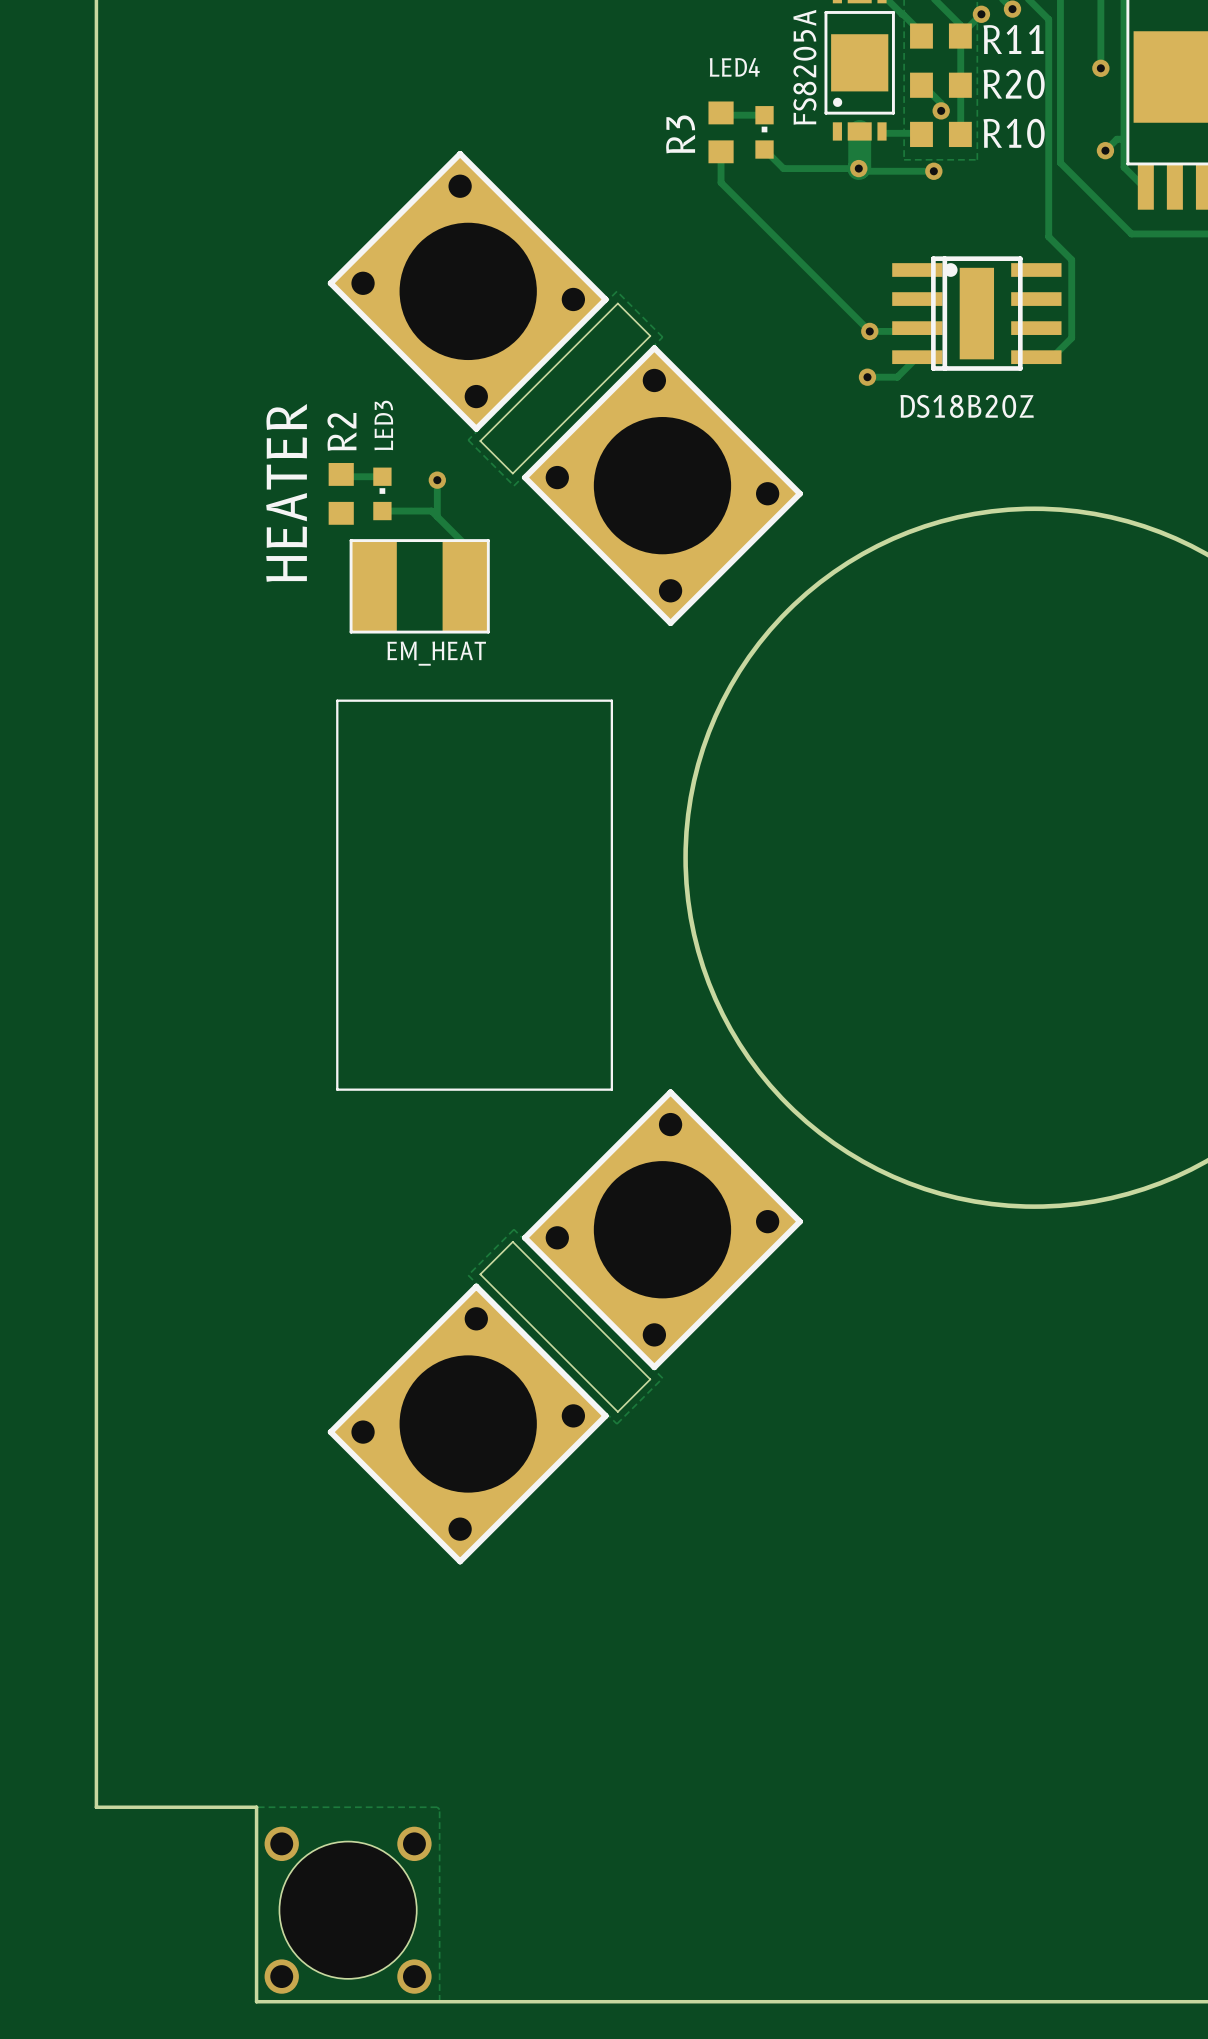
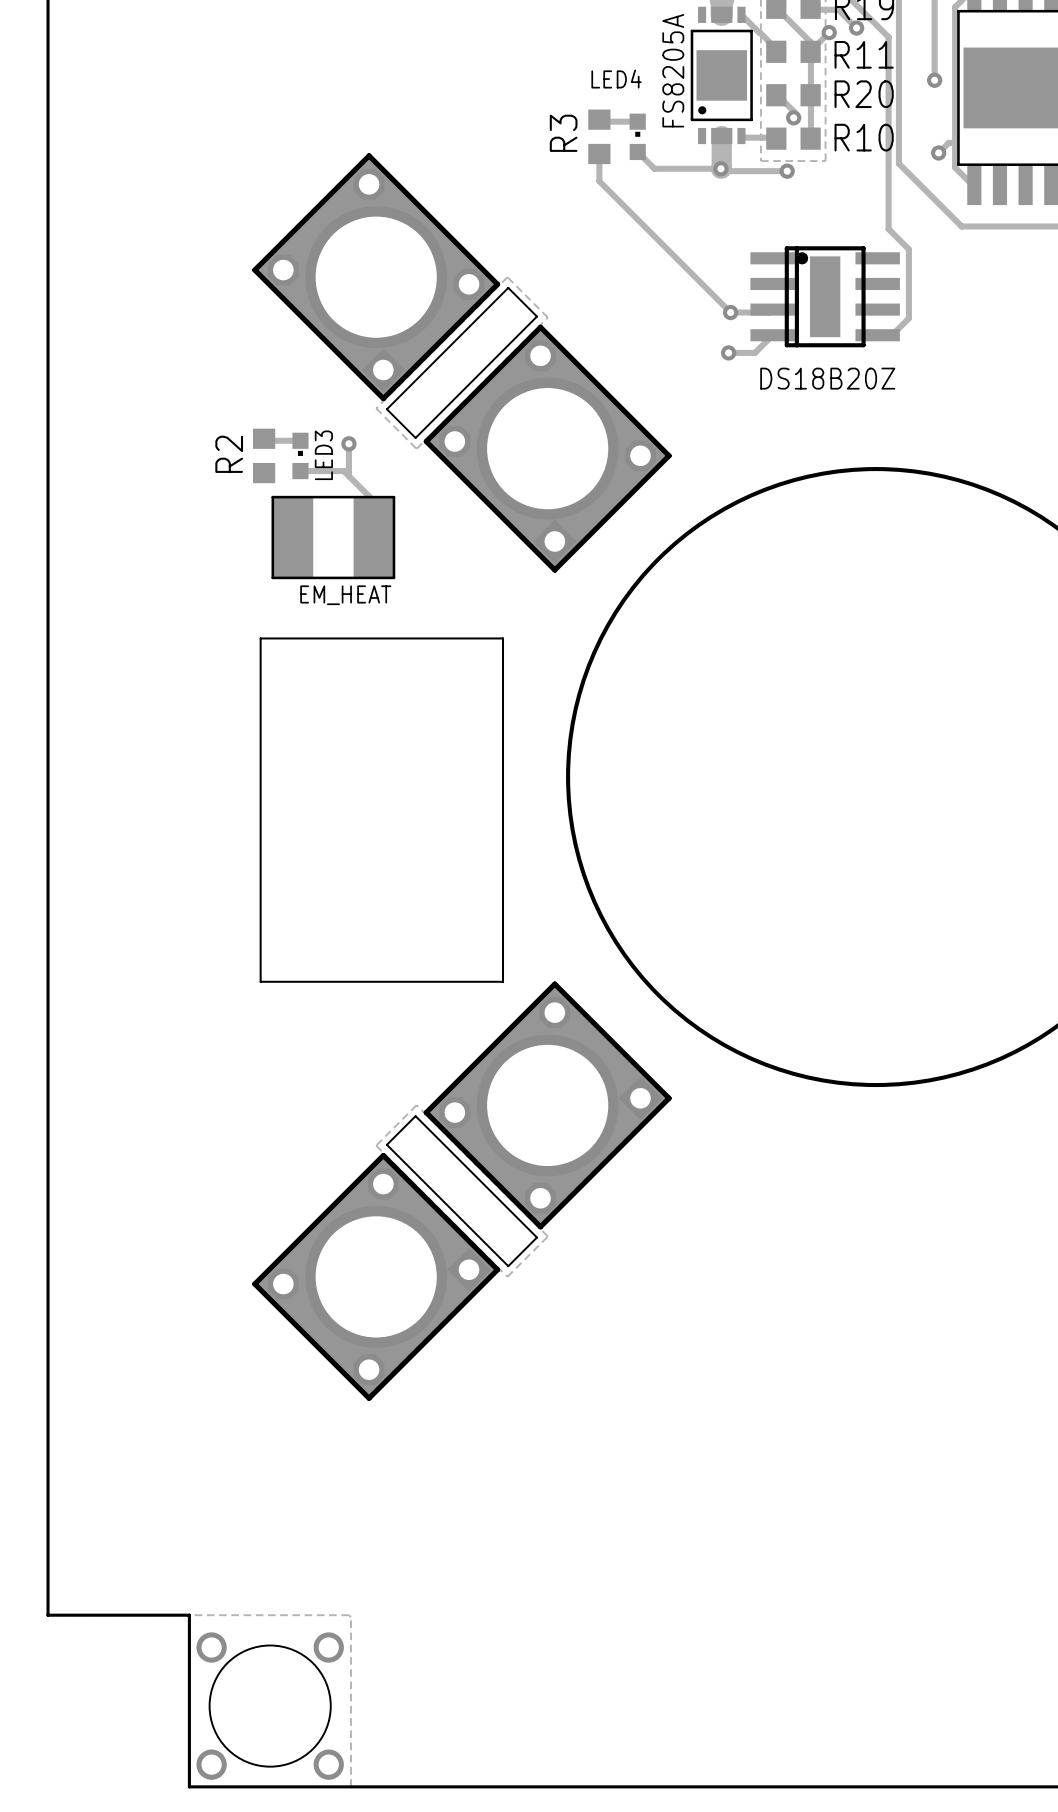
LED3 name position: LED3 (383, 425) -> LED3 (323, 455)
R2 name position: R2 (341, 431) -> R2 (229, 454)
text: HEATER (286, 492) -> none

